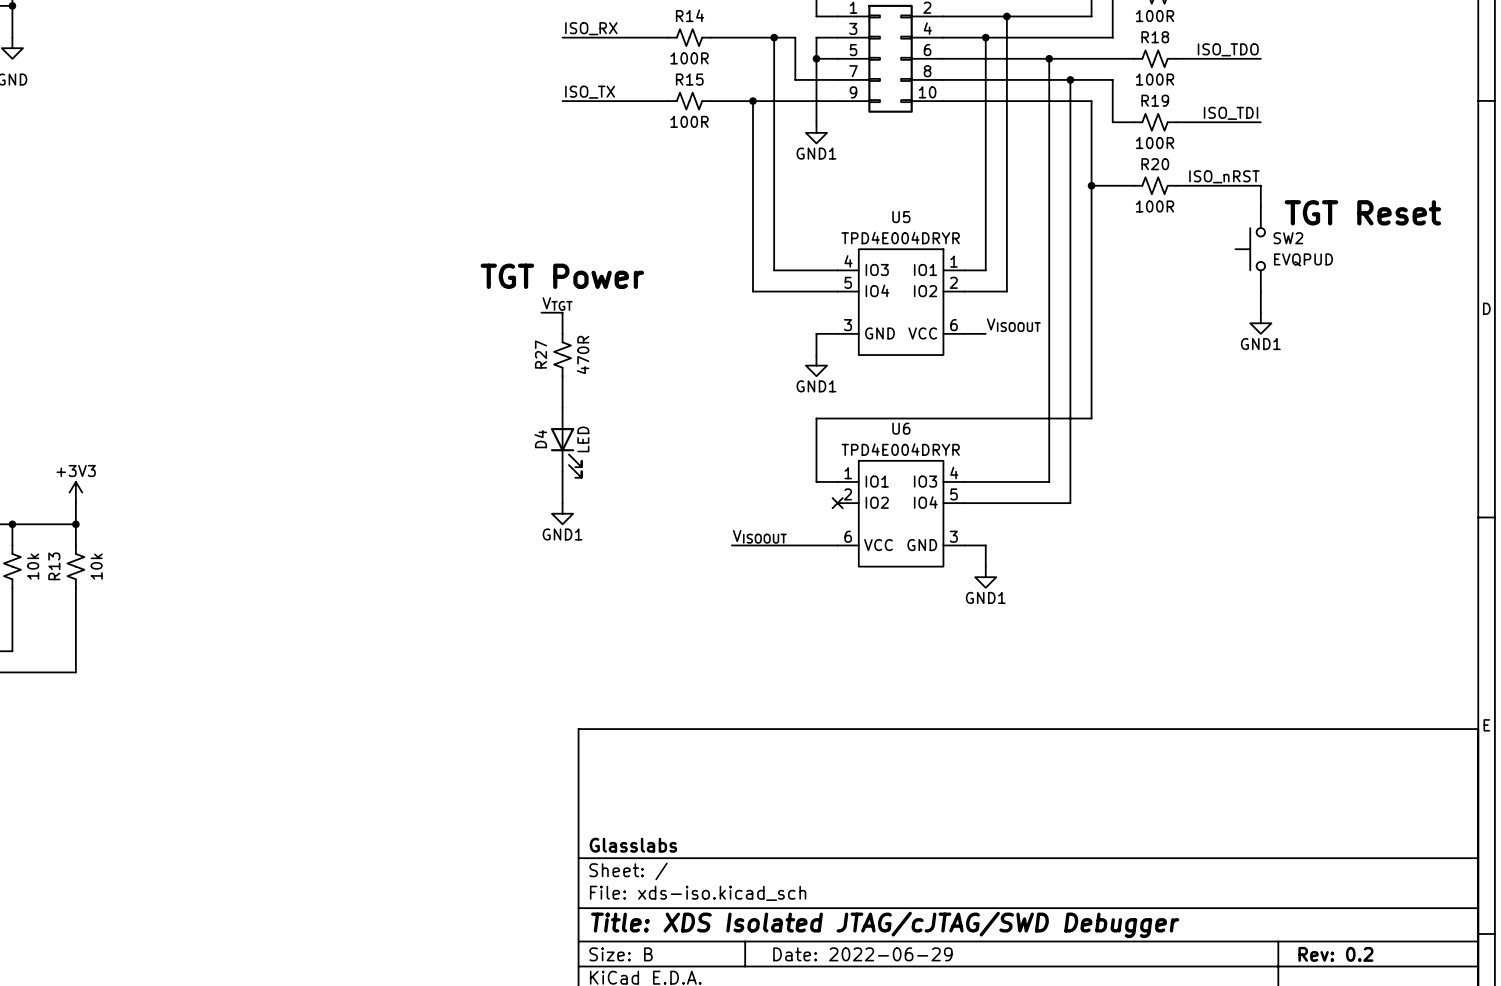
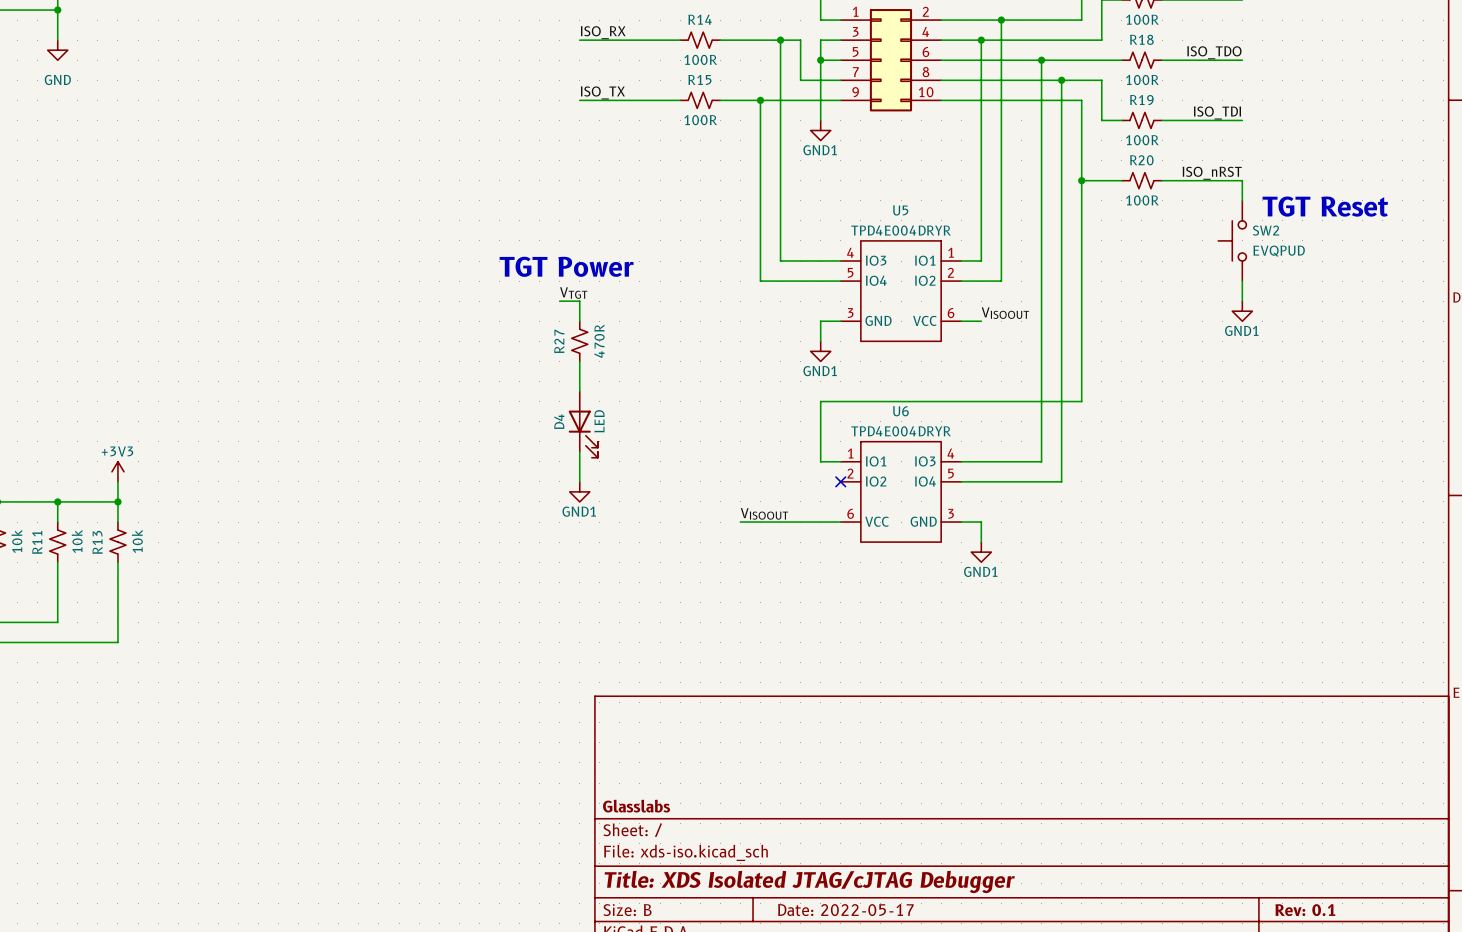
title block: Title: XDS Isolated JTAG/cJTAG/SWD Debugger (885, 924) -> Title: XDS Isolated JTAG/cJTAG Debugger (809, 881)
title block: Date: 2022-06-29 (862, 954) -> Date: 2022-05-17 (845, 910)
title block: Rev: 0.2 (1335, 954) -> Rev: 0.1 (1305, 910)

